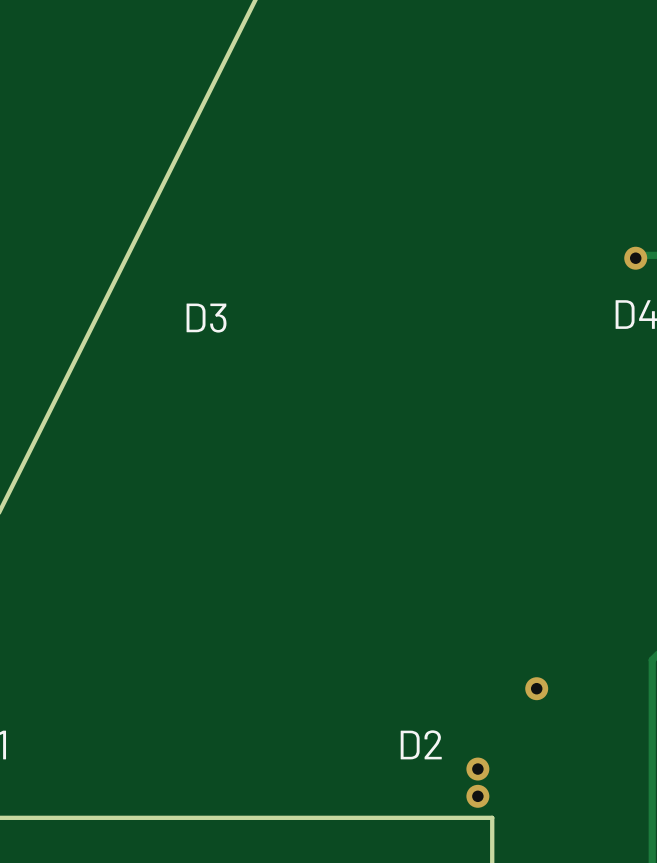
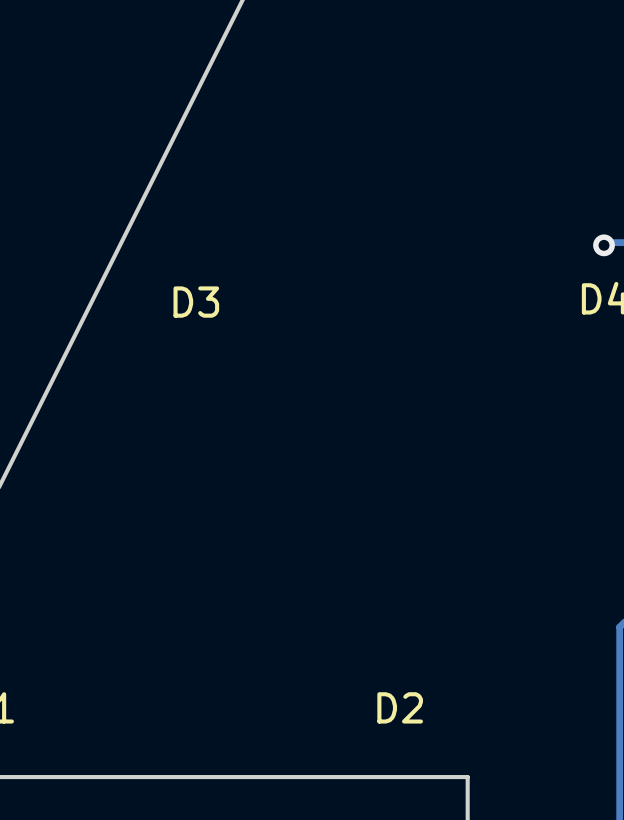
via: (536, 688) -> none
via: (477, 769) -> none
via: (477, 796) -> none

